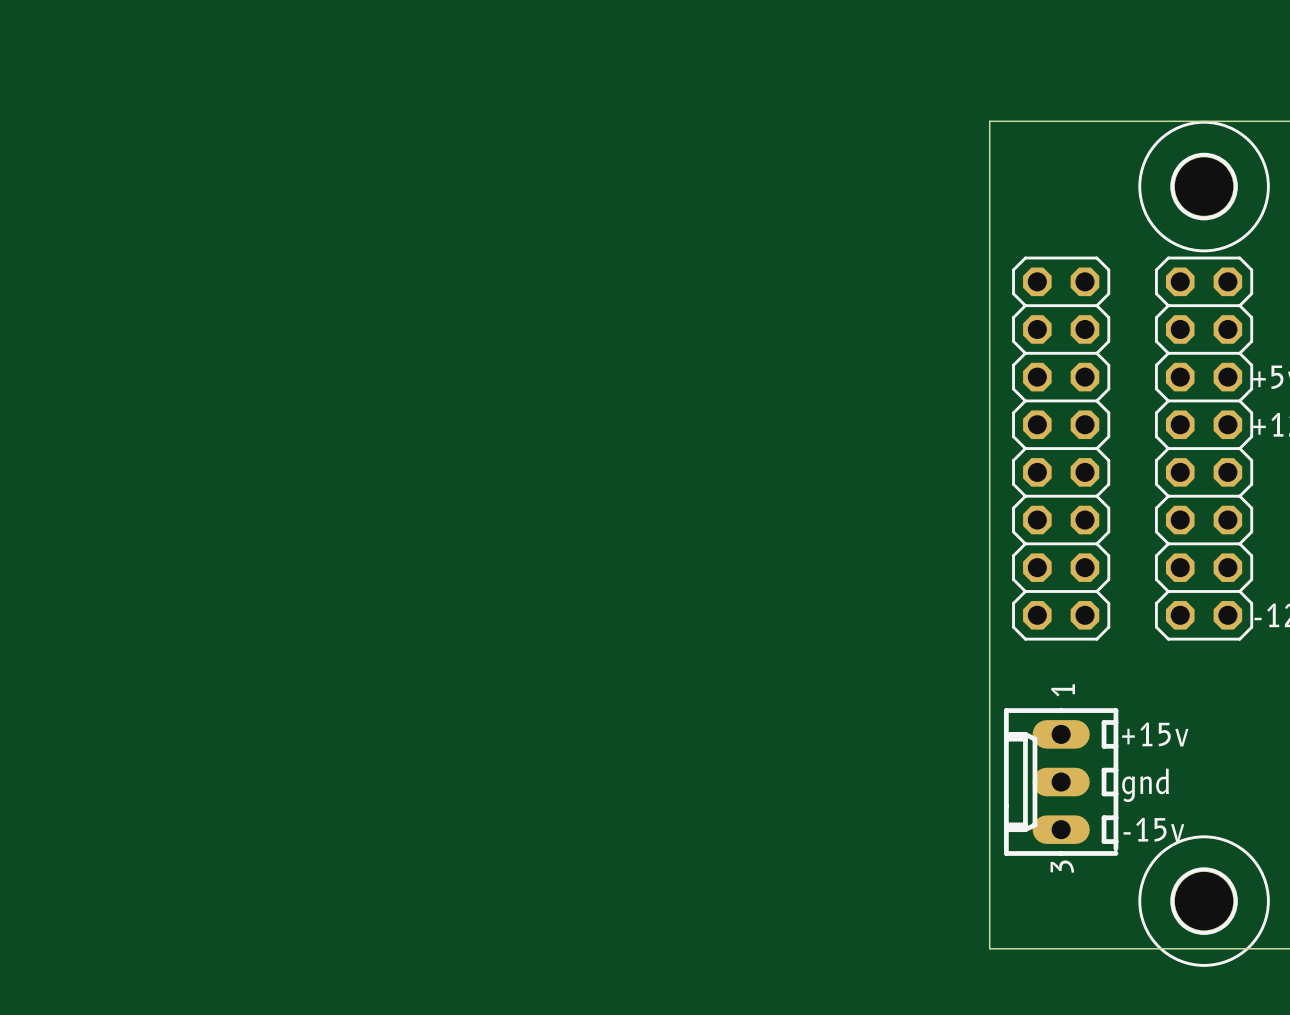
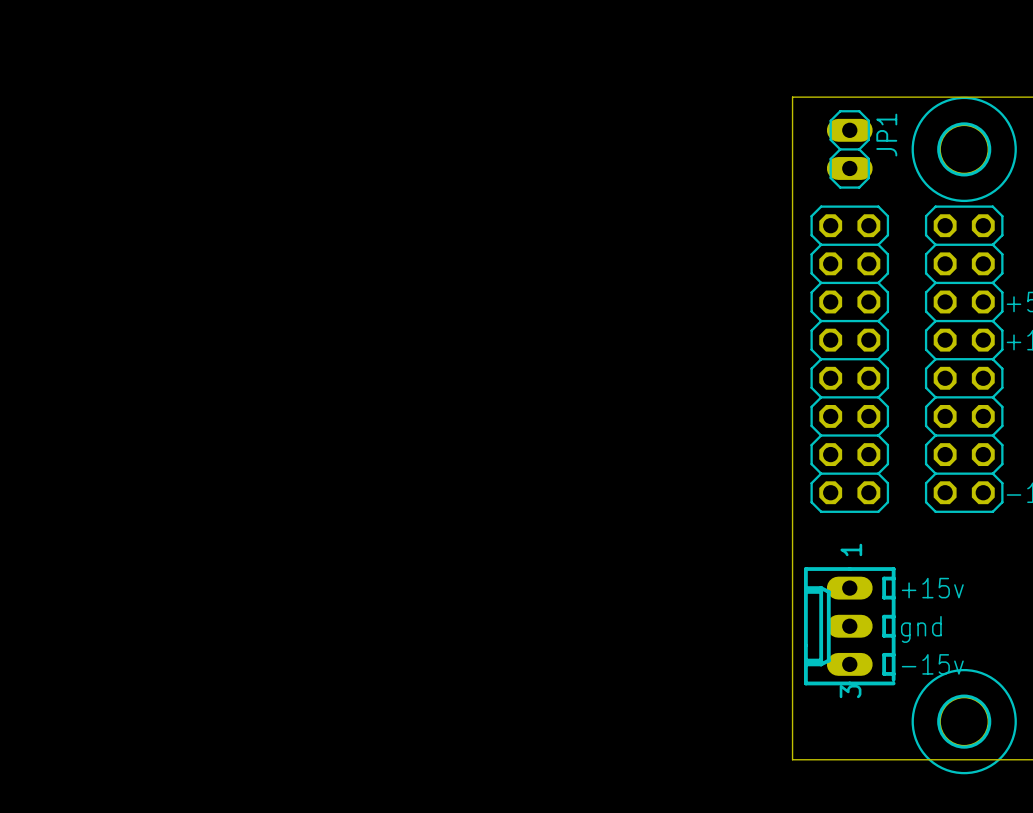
JP1: none -> (849, 149)

